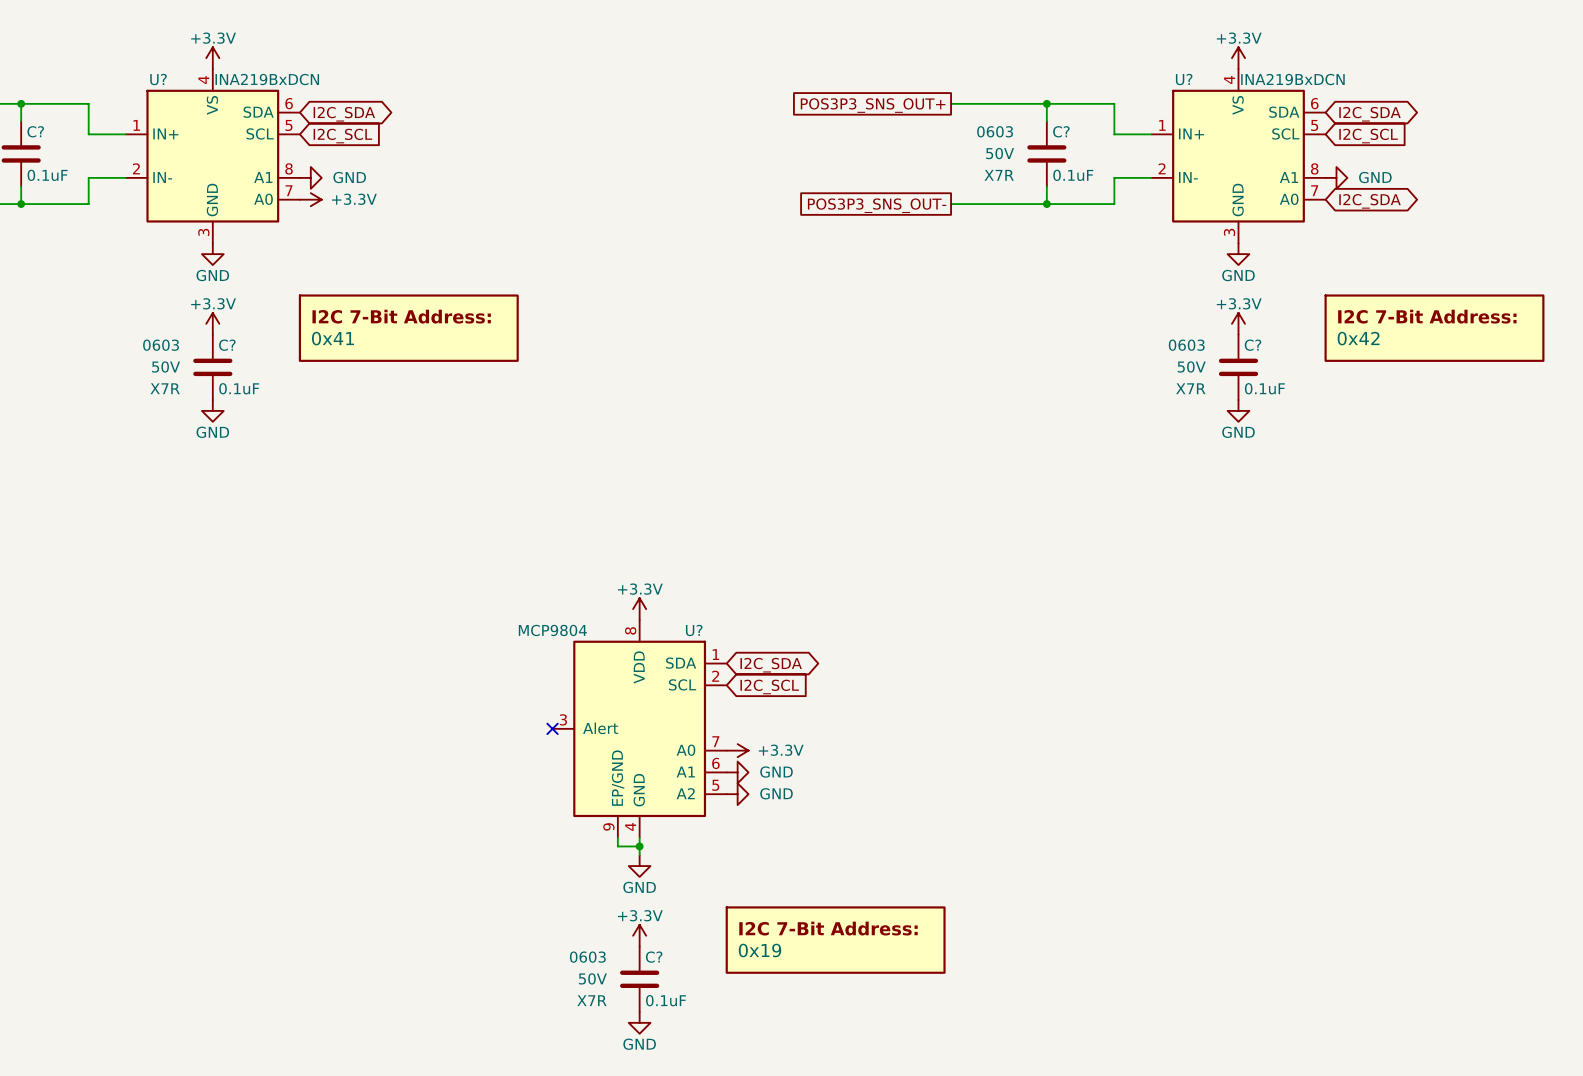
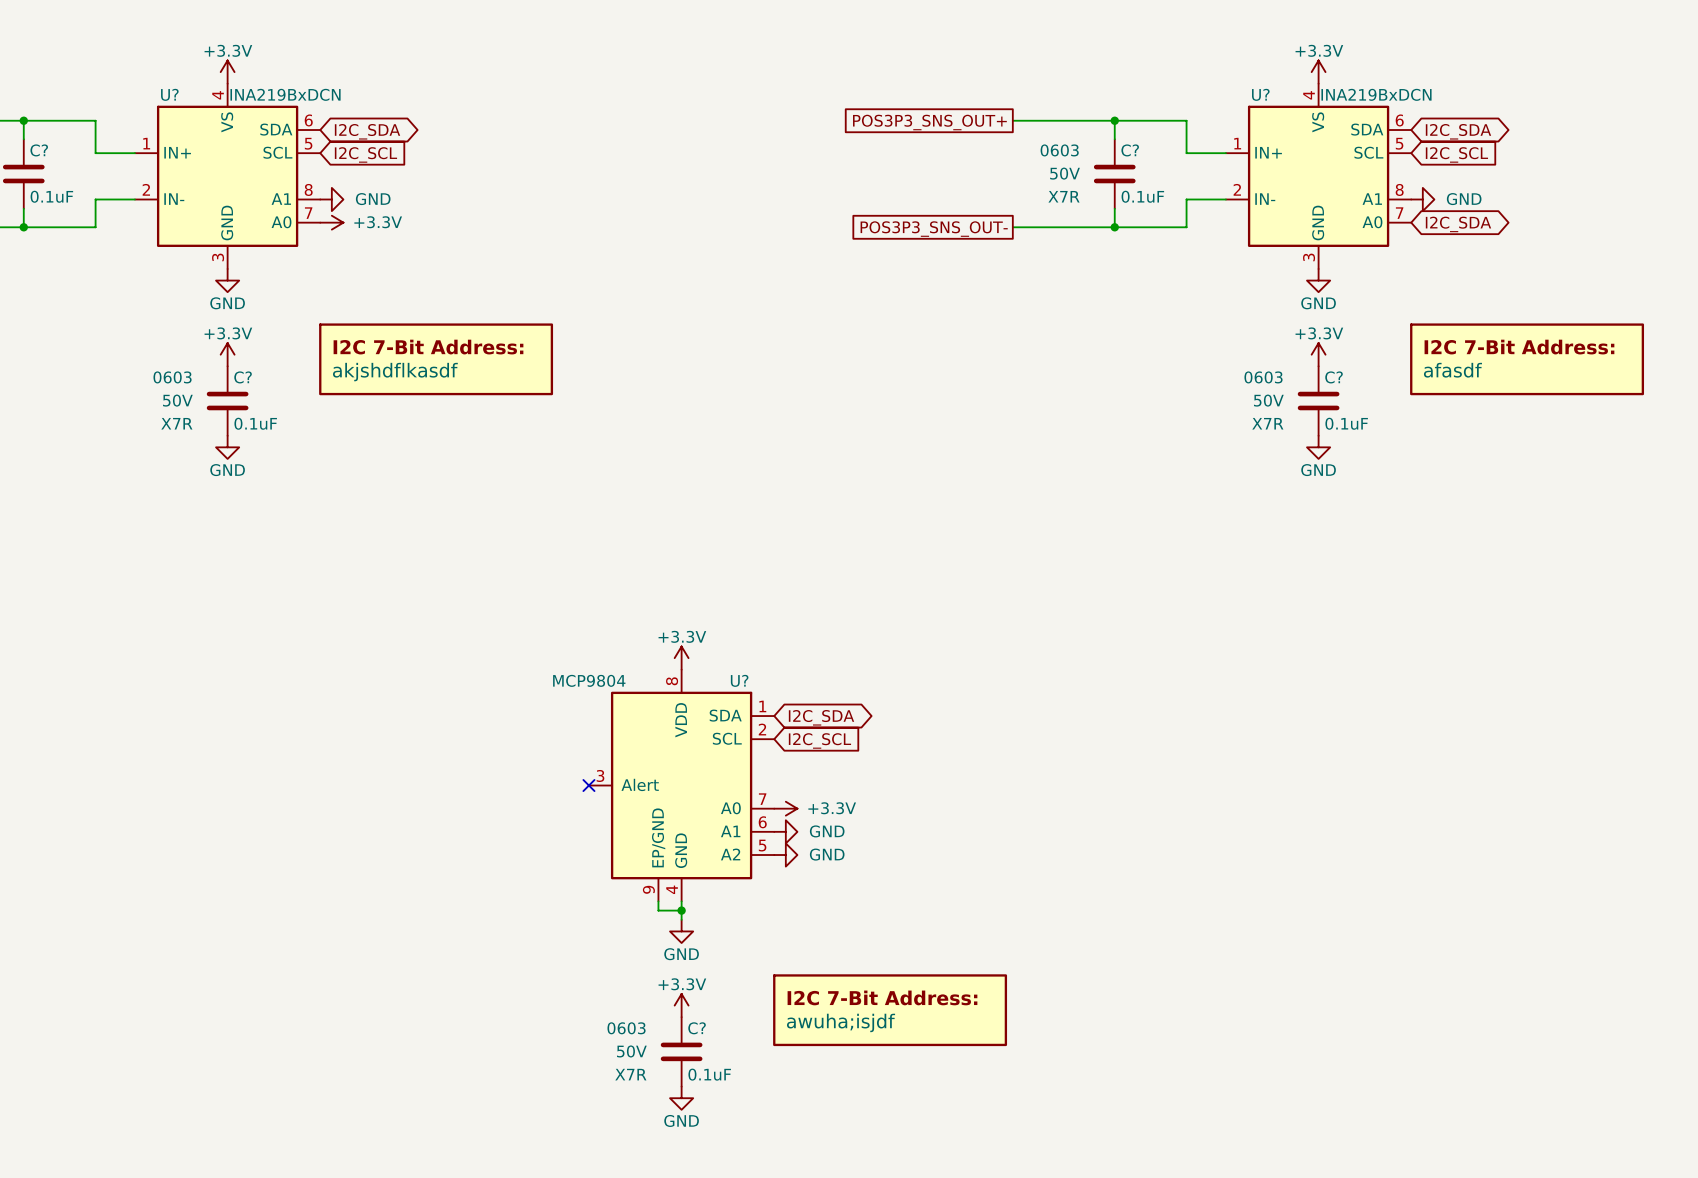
part value: 0x41 (332, 338) -> akjshdflkasdf (395, 372)
part value: 0x42 (1358, 338) -> afasdf (1452, 370)
part value: 0x19 (760, 950) -> awuha;isjdf (841, 1022)

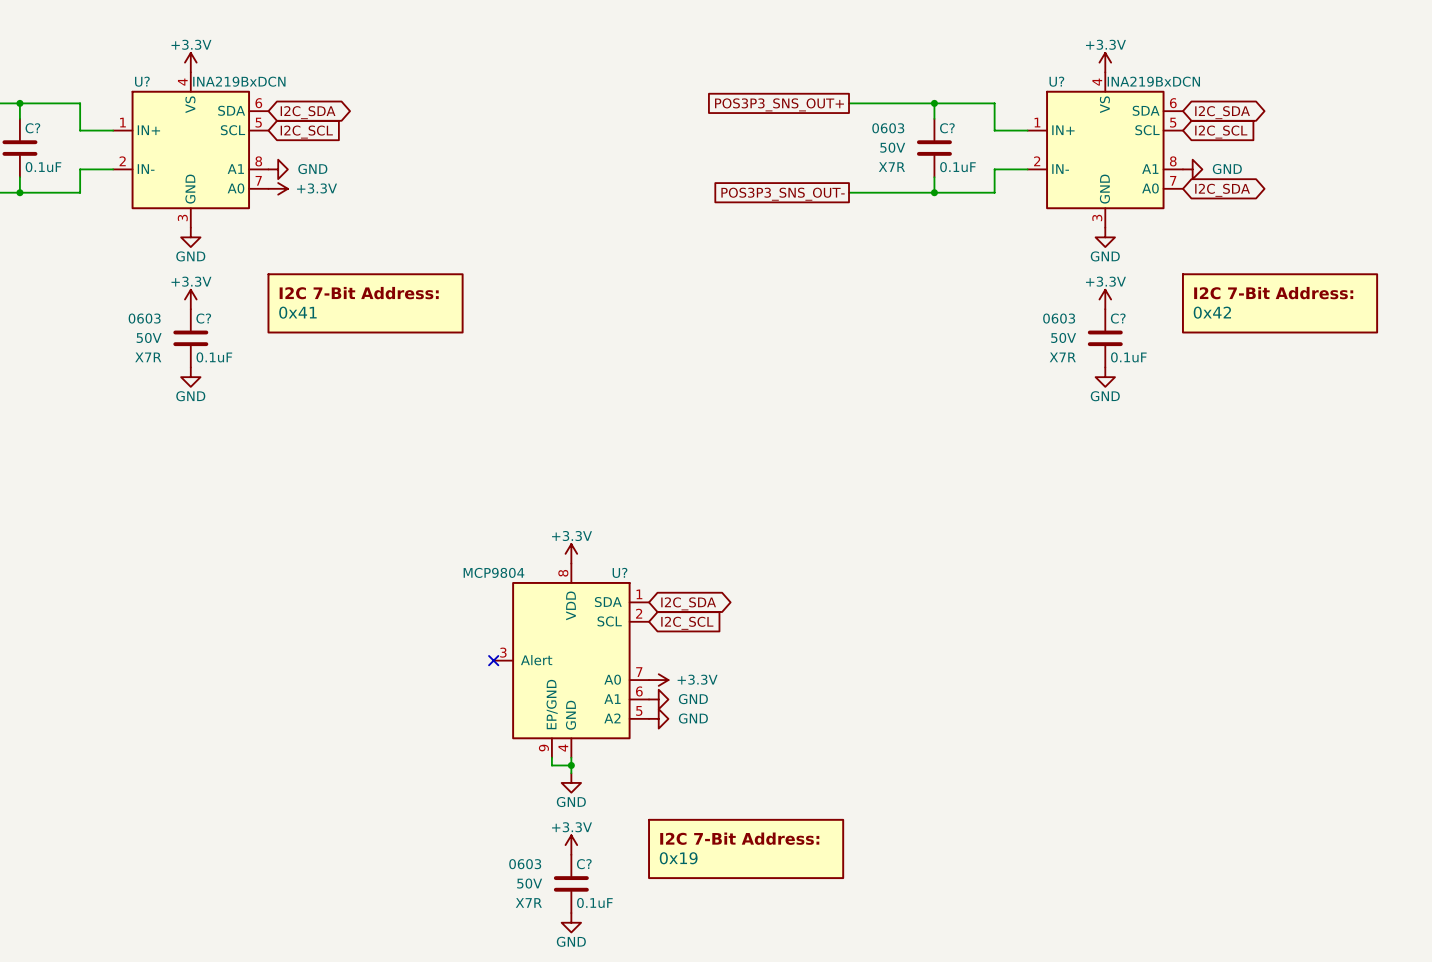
part value: afasdf (1452, 370) -> 0x42 (1212, 312)
part value: akjshdflkasdf (395, 372) -> 0x41 (297, 312)
part value: awuha;isjdf (841, 1022) -> 0x19 (678, 858)

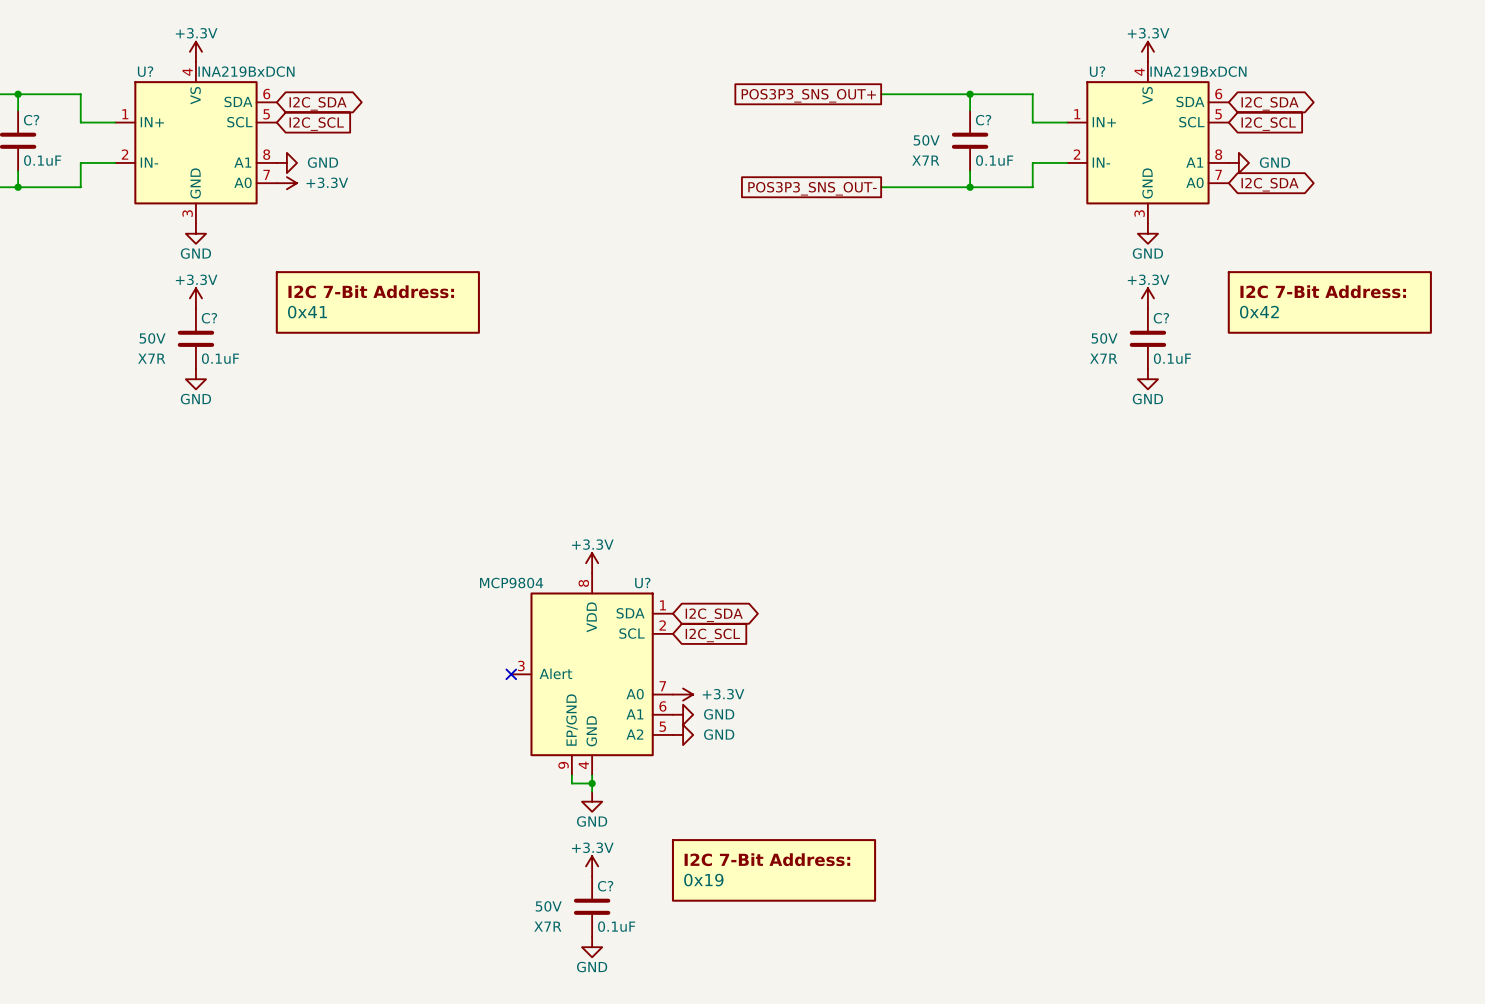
C? text: 0603 (888, 128) -> none
C? text: 0603 (144, 318) -> none
C? text: 0603 (1059, 318) -> none
C? text: 0603 (525, 864) -> none

